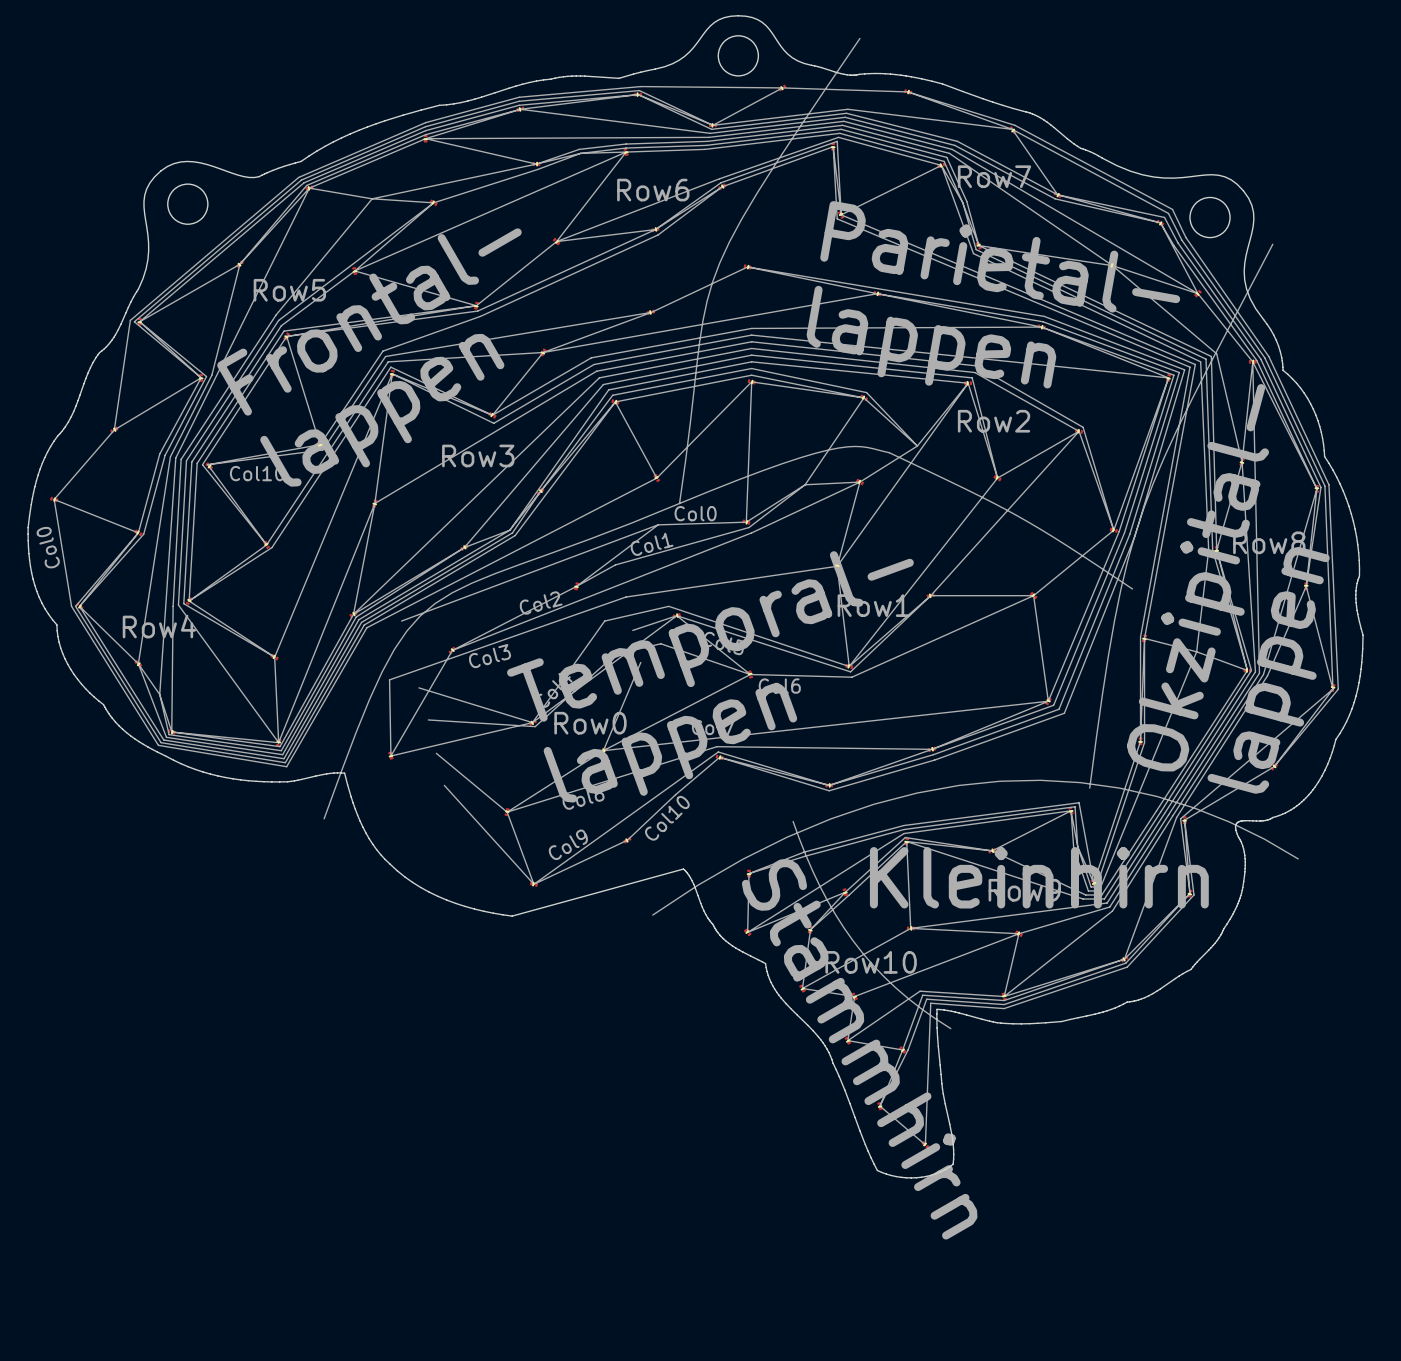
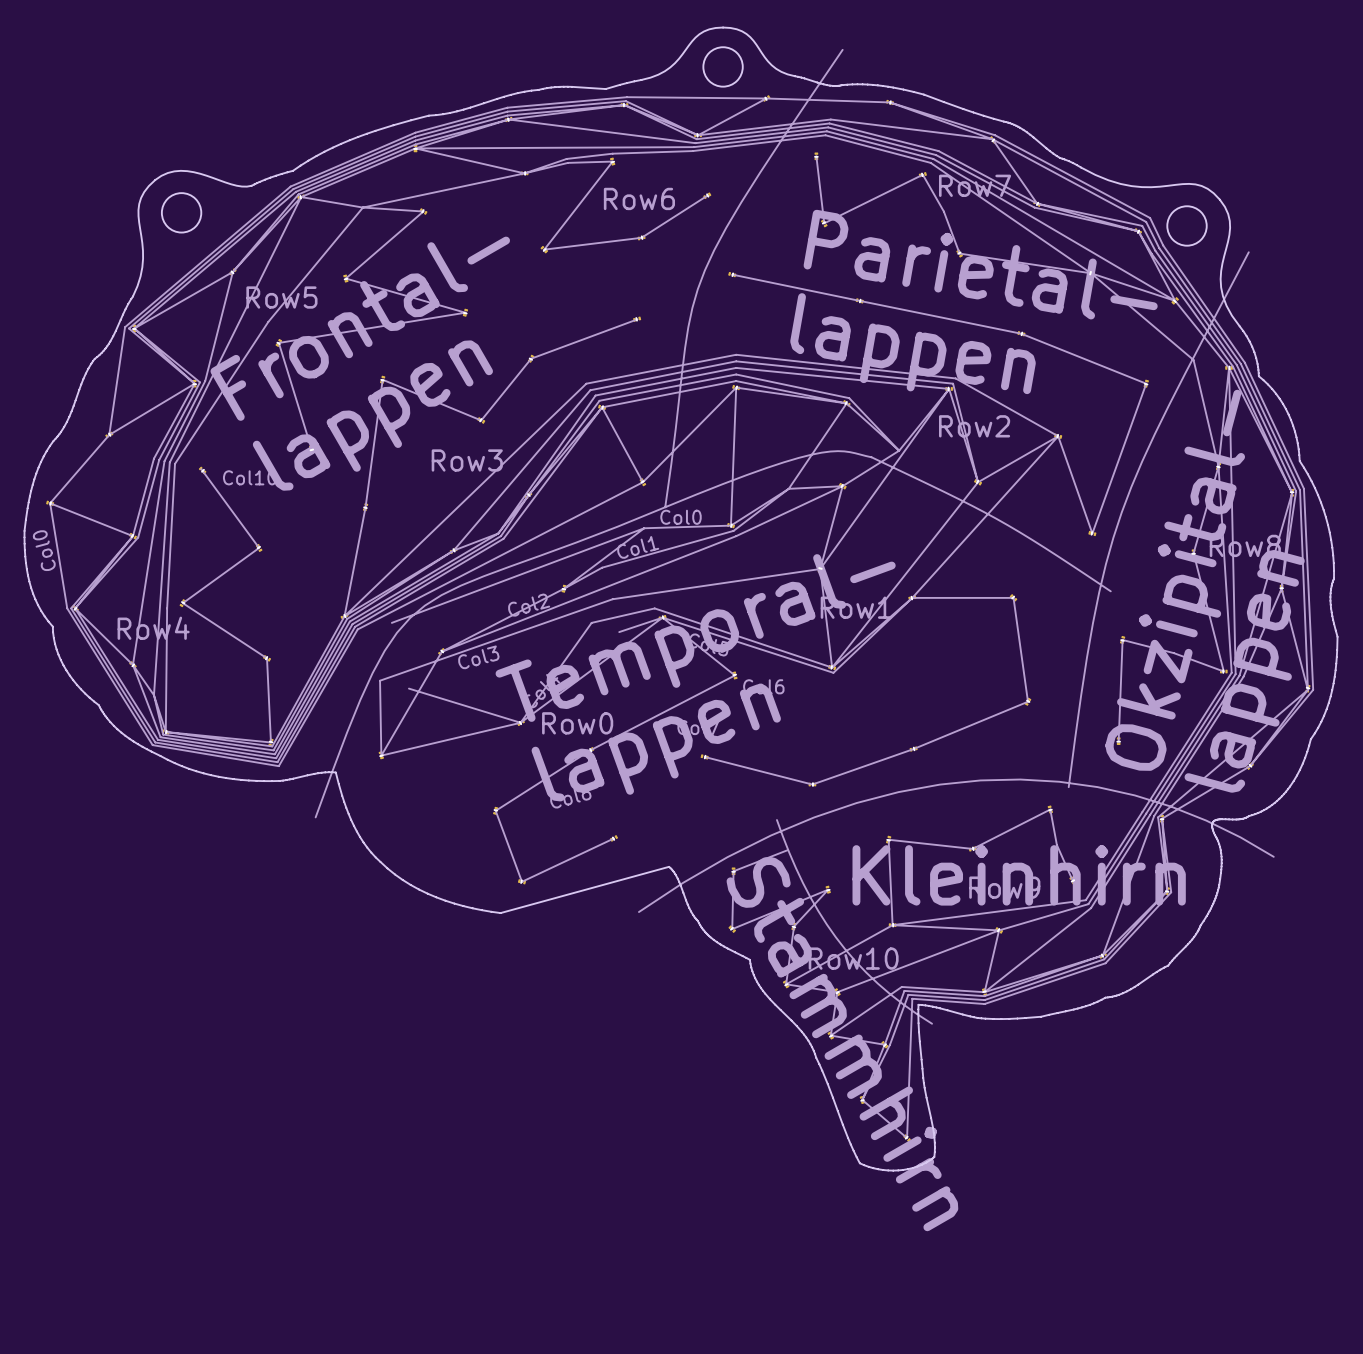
line: (640, 662) (603, 750) (1048, 701) (1119, 531) (1168, 377) (751, 335) (594, 364) (493, 423) (392, 373) (274, 657) (183, 603) (191, 462) (281, 325) (354, 270) (626, 152) (704, 149) (839, 133) (944, 161) (962, 202) (976, 249) (1206, 359) (1212, 550) (1247, 670) (1101, 894) (1085, 894) (992, 850) (905, 837) (845, 892) -> none
line: (428, 719) (535, 726) (615, 654) (660, 643) (750, 674) (851, 677) (1033, 595) (1113, 530) (1083, 427) (976, 365) (751, 341) (596, 371) (374, 503) (278, 742) (178, 605) (186, 460) (278, 320) (433, 202) (537, 169) (580, 153) (626, 148) (706, 145) (841, 129) (946, 157) (966, 201) (978, 245) (1211, 356) (1216, 550) (1251, 670) (1104, 899) (1083, 899) (906, 841) (810, 929) -> none
line: (436, 753) (507, 812) (716, 746) (932, 749) (1053, 705) (1124, 532) (1173, 375) (1041, 327) (751, 328) (591, 357) (492, 415) (390, 367) (271, 547) (189, 601) (197, 463) (284, 331) (476, 305) (556, 241) (719, 178) (838, 137) (941, 165) (973, 253) (1200, 361) (1208, 550) (1196, 651) (1099, 890) (1088, 890) (1073, 848) (1071, 810) (904, 833) (747, 932) -> none
line: (444, 785) (533, 884) (718, 752) (829, 785) (933, 754) (1059, 709) (1129, 534) (1179, 372) (1042, 321) (877, 293) (543, 352) (388, 361) (266, 544) (202, 464) (286, 336) (477, 311) (655, 229) (720, 182) (837, 141) (841, 214) (1195, 364) (1144, 638) (1144, 742) (1096, 886) (1091, 886) (1077, 846) (1075, 806) (904, 829) (749, 873) -> none
text: Col10 (667, 818) -> none
line: (627, 840) (675, 794) (719, 757) (829, 790) (934, 760) (1064, 713) (1135, 535) (1184, 369) (1044, 316) (747, 266) (651, 312) (385, 356) (322, 450) (207, 464) (320, 444) (382, 351) (480, 316) (658, 234) (722, 186) (833, 146) (837, 218) (1189, 367) (1140, 637) (1140, 741) (1093, 882) (1079, 802) (904, 825) (803, 852) -> none
text: Col9 (568, 844) -> none

